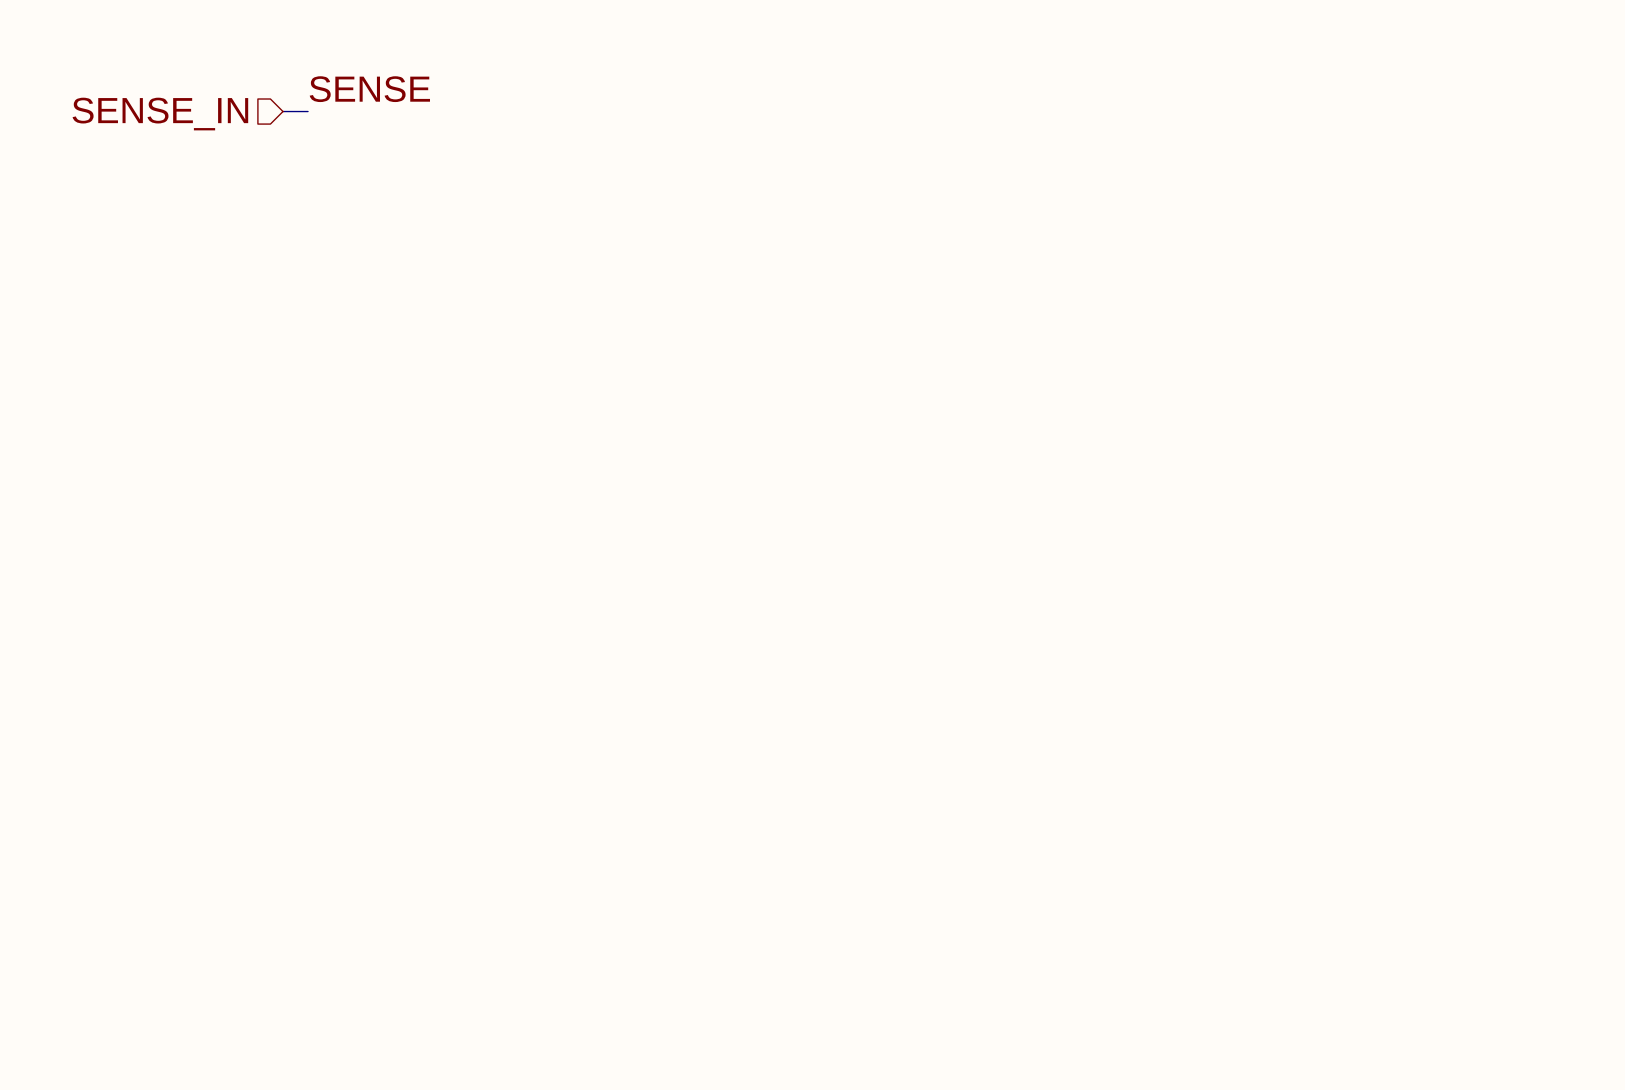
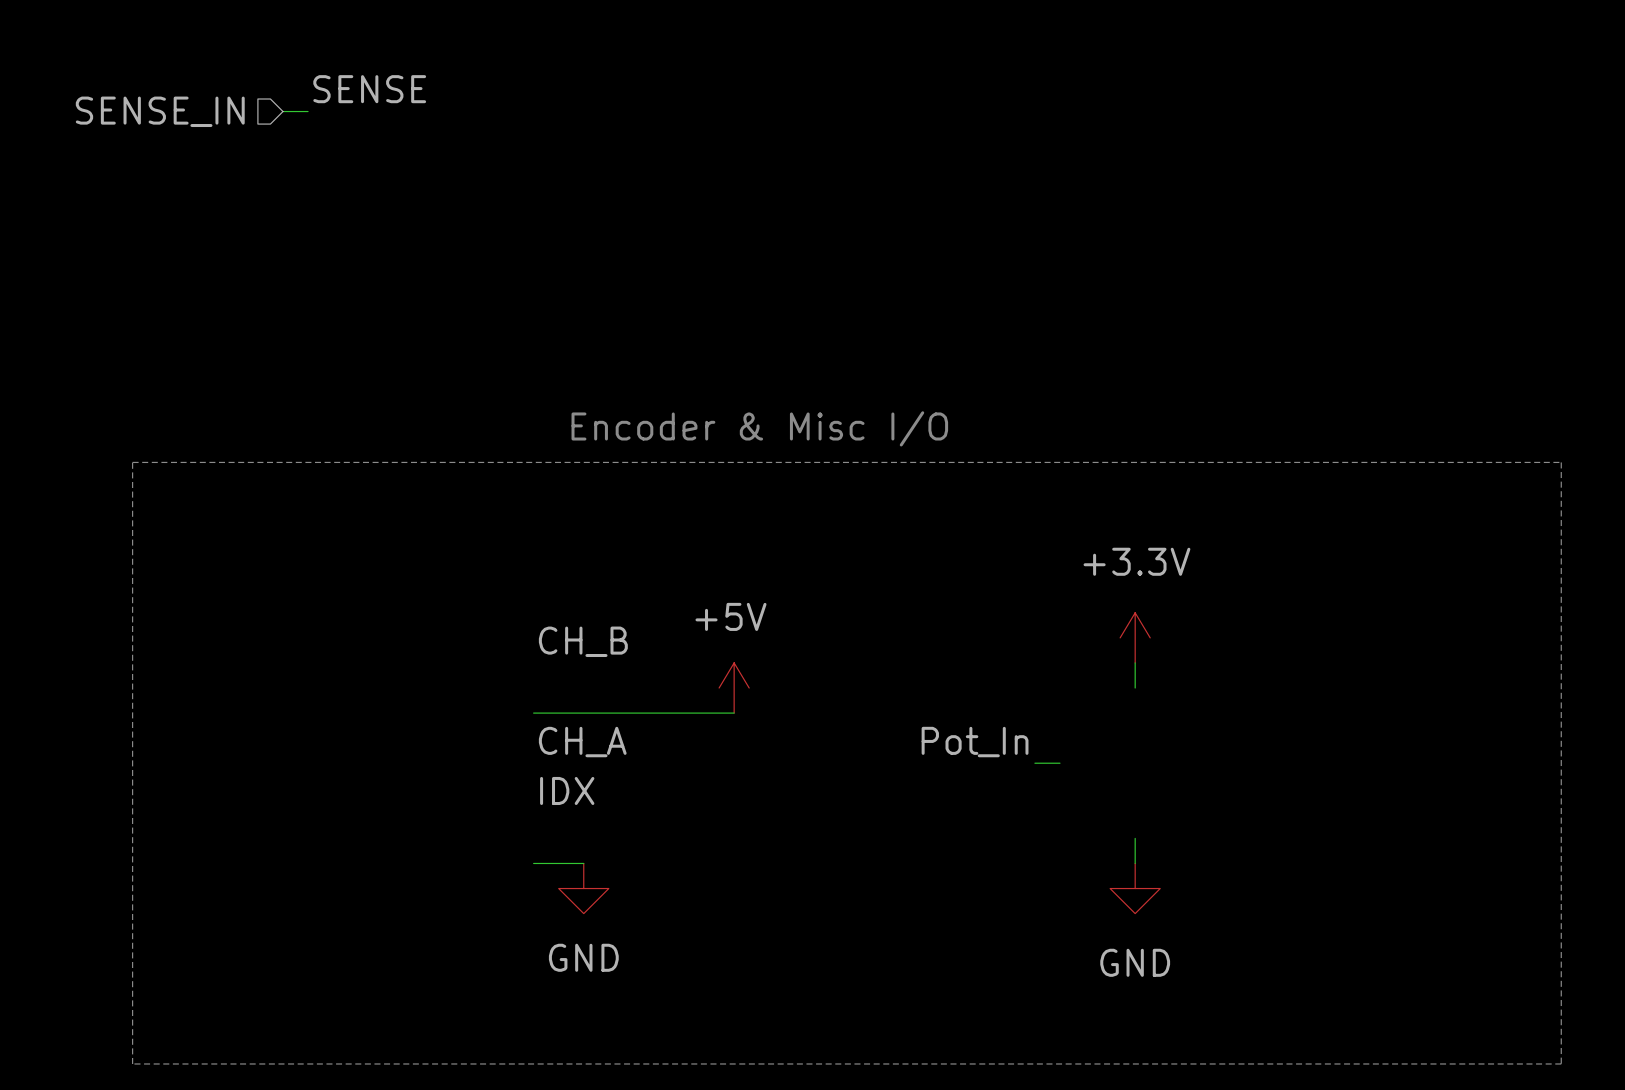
text: none -> Encoder & Misc I/O (759, 428)
line: none -> (132, 462) (132, 1063) (1561, 1063) (1561, 462) (132, 462)
power symbol: none -> +3.3V (1135, 637)
label: none -> CH_B (583, 641)
wire: none -> (1135, 662) (1135, 688)
power symbol: none -> +5V (734, 688)
wire: none -> (533, 713) (734, 713)
label: none -> CH_A (582, 742)
label: none -> Pot_In (975, 742)
wire: none -> (1034, 763) (1059, 763)
label: none -> IDX (567, 790)
wire: none -> (1135, 838) (1135, 863)
wire: none -> (533, 863) (583, 863)
power symbol: none -> GND (583, 888)
power symbol: none -> GND (1135, 888)

